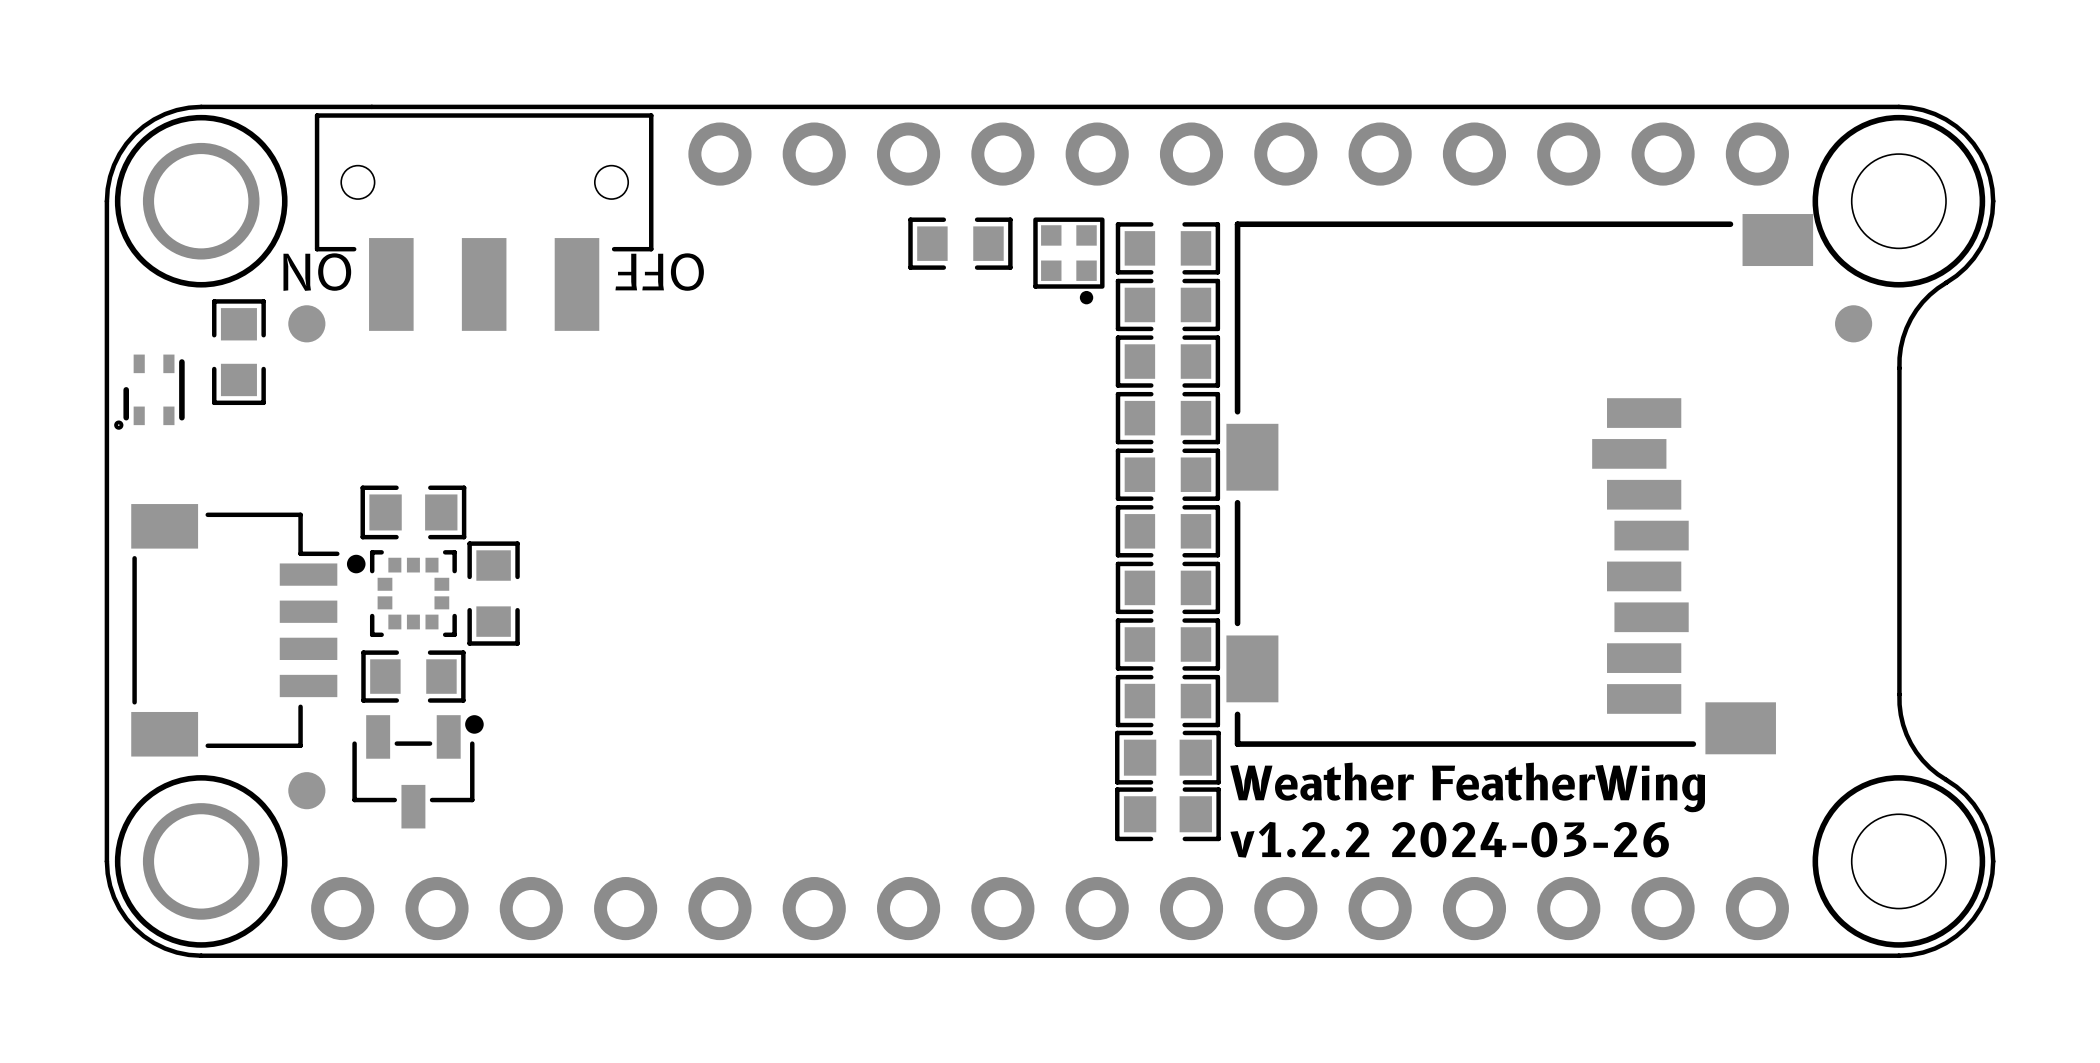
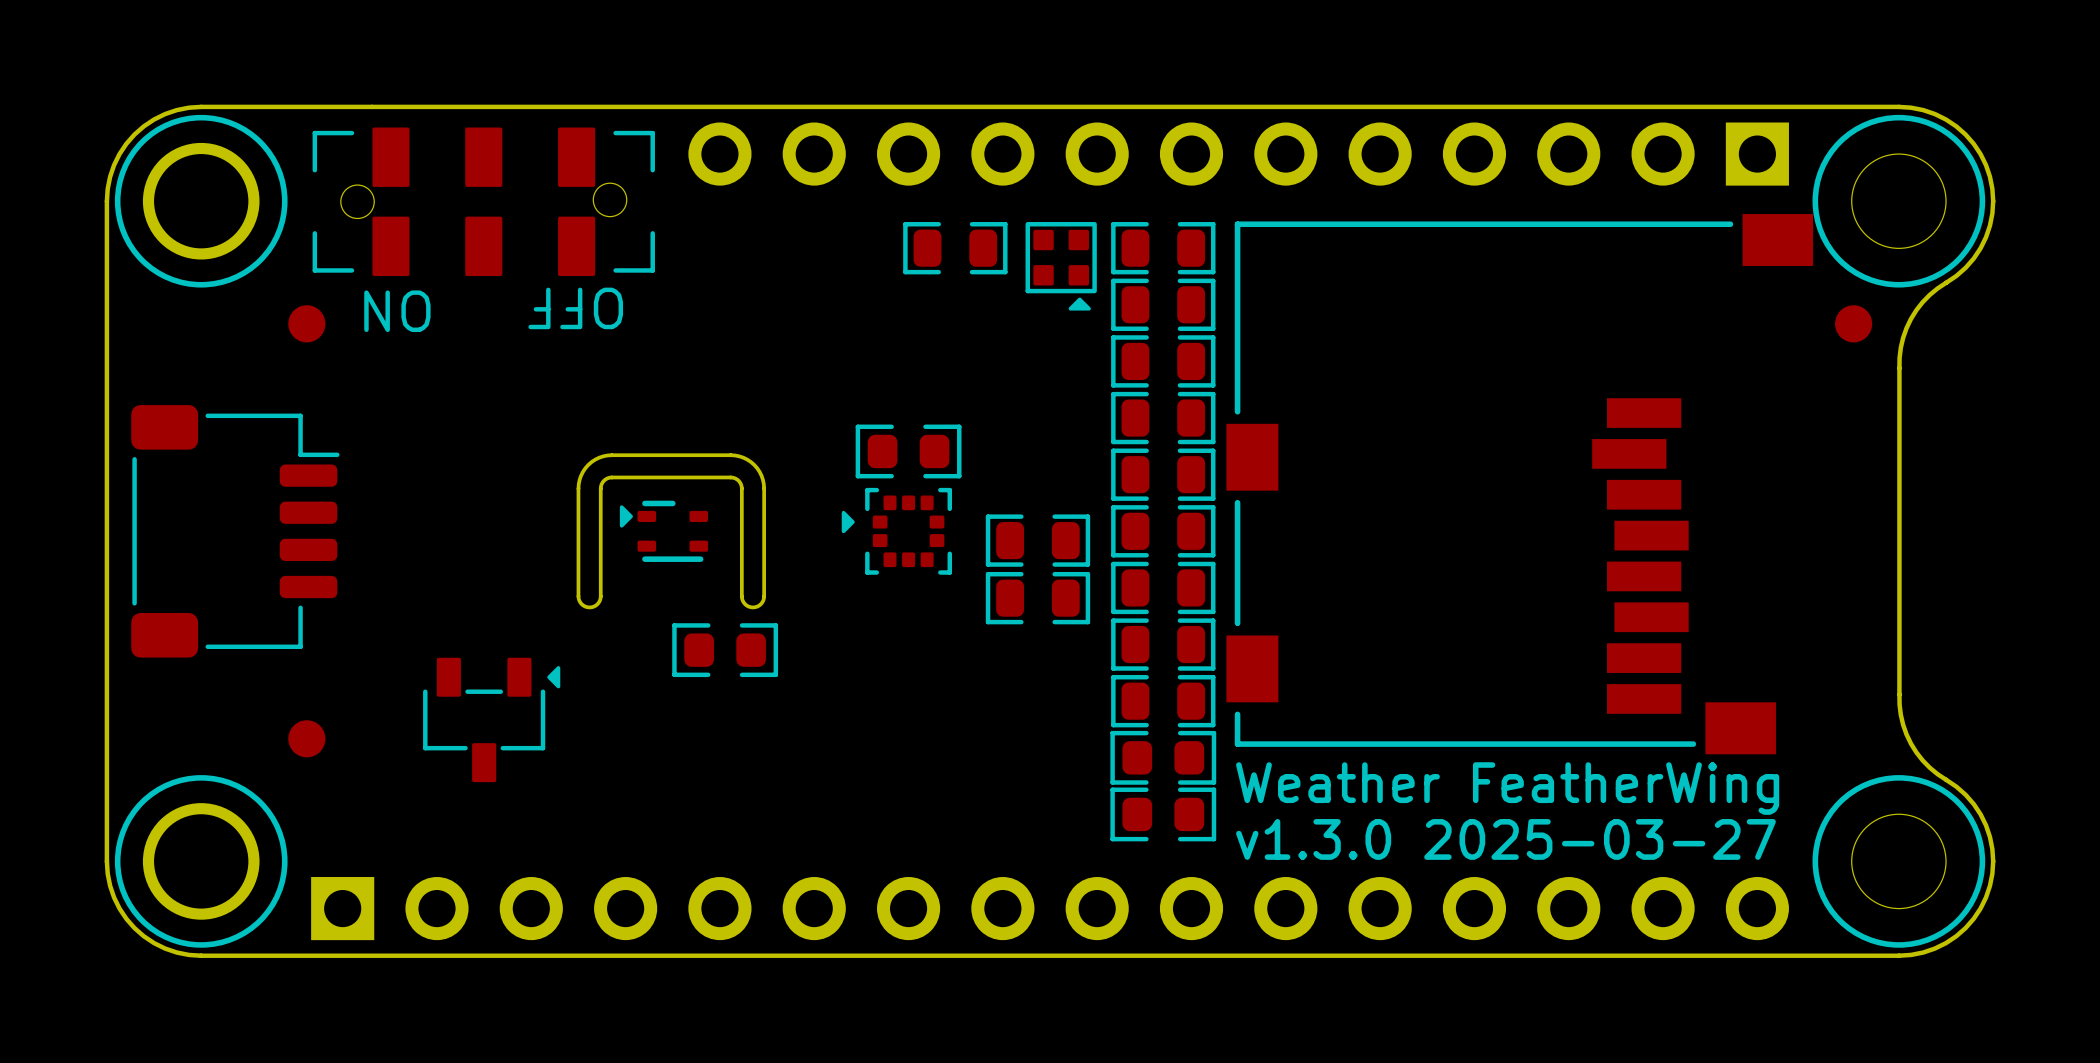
part footprint: [314, 113, 654, 331] -> [312, 127, 655, 277]
part footprint: [688, 122, 1789, 186] -> [688, 122, 1789, 186]
part footprint: [908, 217, 1013, 270] -> [903, 222, 1008, 275]
part footprint: [1033, 217, 1105, 305] -> [1025, 222, 1097, 311]
part footprint: [1115, 222, 1221, 275] -> [1111, 222, 1216, 275]
text position: ON (317, 272) -> ON (397, 311)
text position: OFF (659, 272) -> OFF (575, 308)
part footprint: [1115, 278, 1221, 332] -> [1111, 278, 1216, 331]
part footprint: [1115, 335, 1221, 388] -> [1111, 335, 1216, 388]
part: (238, 352) -> none
part footprint: [1115, 391, 1221, 445] -> [1111, 391, 1216, 445]
part: (149, 392) -> none
part footprint: [1115, 448, 1221, 501] -> [1111, 448, 1216, 501]
part: none -> (908, 451)
board edge: none -> (611, 455) (735, 455) (743, 457) (754, 464) (761, 475) (764, 488) (764, 596) (760, 604) (750, 607) (745, 604) (741, 597) (741, 488) (737, 479) (730, 477) (611, 477) (604, 480) (600, 487) (600, 598) (593, 606) (588, 607) (582, 604) (578, 596) (578, 484) (582, 471) (588, 464) (599, 457) (611, 455)
part footprint: [1115, 505, 1221, 558] -> [1111, 505, 1216, 558]
part: (413, 512) -> none
part: none -> (235, 531)
part: none -> (663, 531)
part: none -> (896, 531)
part: none -> (1037, 540)
part footprint: [1115, 561, 1221, 615] -> [1111, 561, 1216, 615]
part: (401, 593) -> none
part: (493, 593) -> none
part: none -> (1037, 598)
part footprint: [1115, 618, 1221, 671] -> [1111, 618, 1216, 671]
part: (235, 630) -> none
part: none -> (725, 650)
part footprint: [1115, 674, 1221, 728] -> [1111, 675, 1216, 728]
part: (413, 676) -> none
part: none -> (491, 719)
part footprint: [1115, 730, 1221, 785] -> [1110, 730, 1217, 785]
part: (418, 771) -> none
part footprint: [1115, 787, 1221, 842] -> [1110, 787, 1217, 842]
part position: (306, 790) -> (306, 738)
text: v1.2.2 2024-03-26 (1449, 839) -> v1.3.0 2025-03-27 (1505, 839)
part footprint: [311, 877, 1789, 941] -> [311, 877, 1789, 941]

